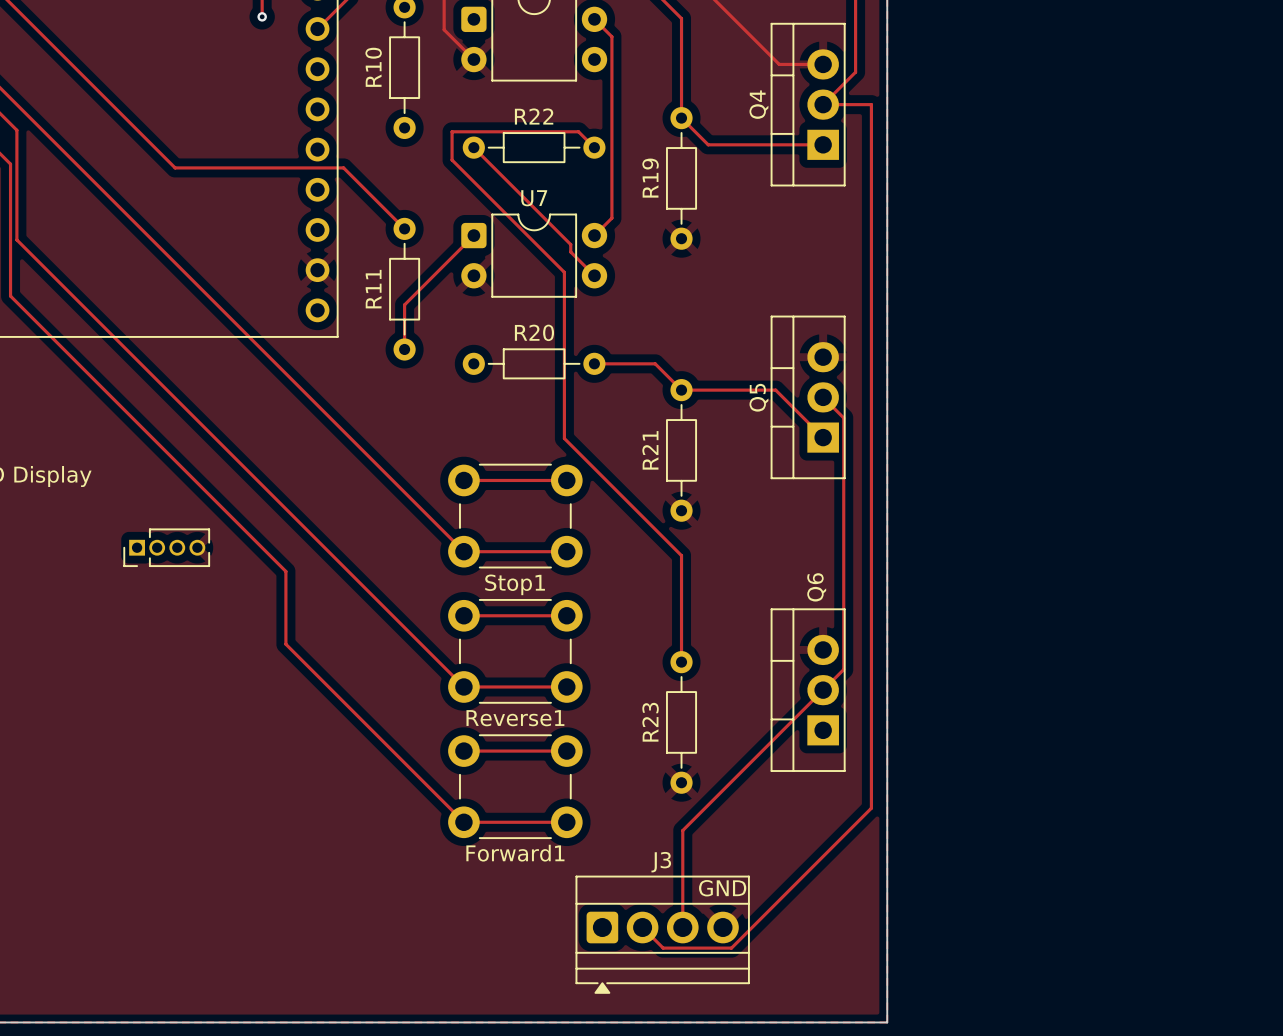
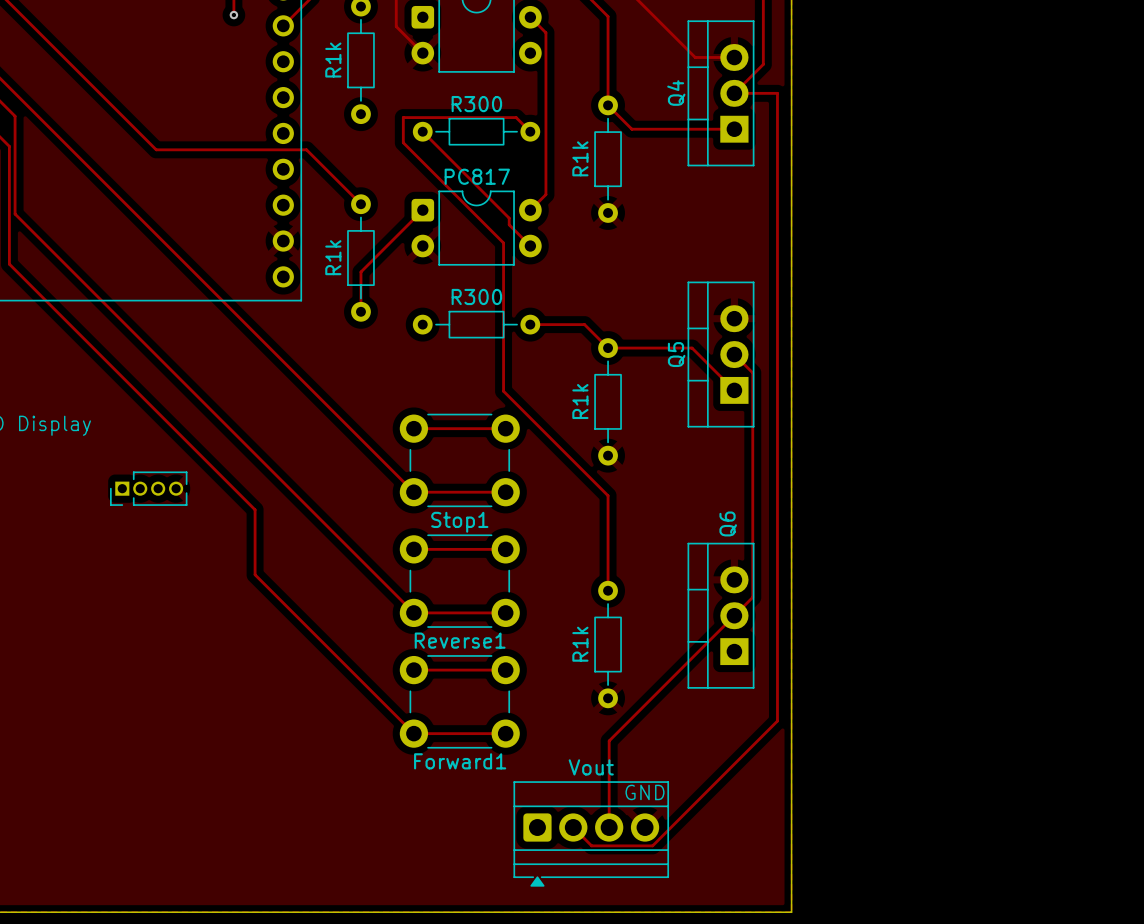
R10 name: R10 (373, 67) -> R1k (333, 60)
R22 name: R22 (534, 116) -> R300 (476, 104)
R19 name: R19 (650, 178) -> R1k (580, 158)
U7 name: U7 (534, 198) -> PC817 (477, 176)
R11 name: R11 (373, 289) -> R1k (333, 257)
R20 name: R20 (534, 332) -> R300 (476, 296)
R21 name: R21 (650, 450) -> R1k (580, 401)
R23 name: R23 (650, 722) -> R1k (580, 644)
J3 name: J3 (661, 862) -> Vout (591, 767)

